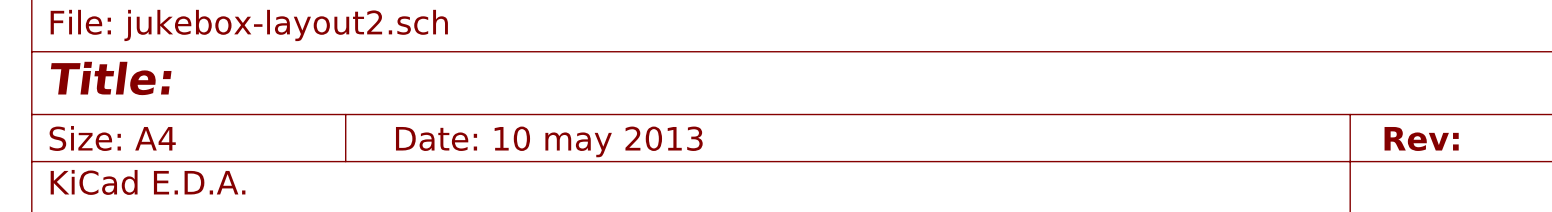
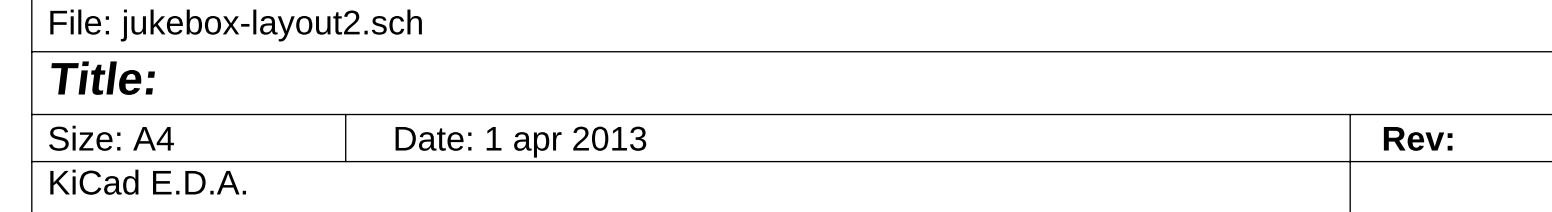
title block: Date: 10 may 2013 (549, 141) -> Date: 1 apr 2013 (520, 142)

